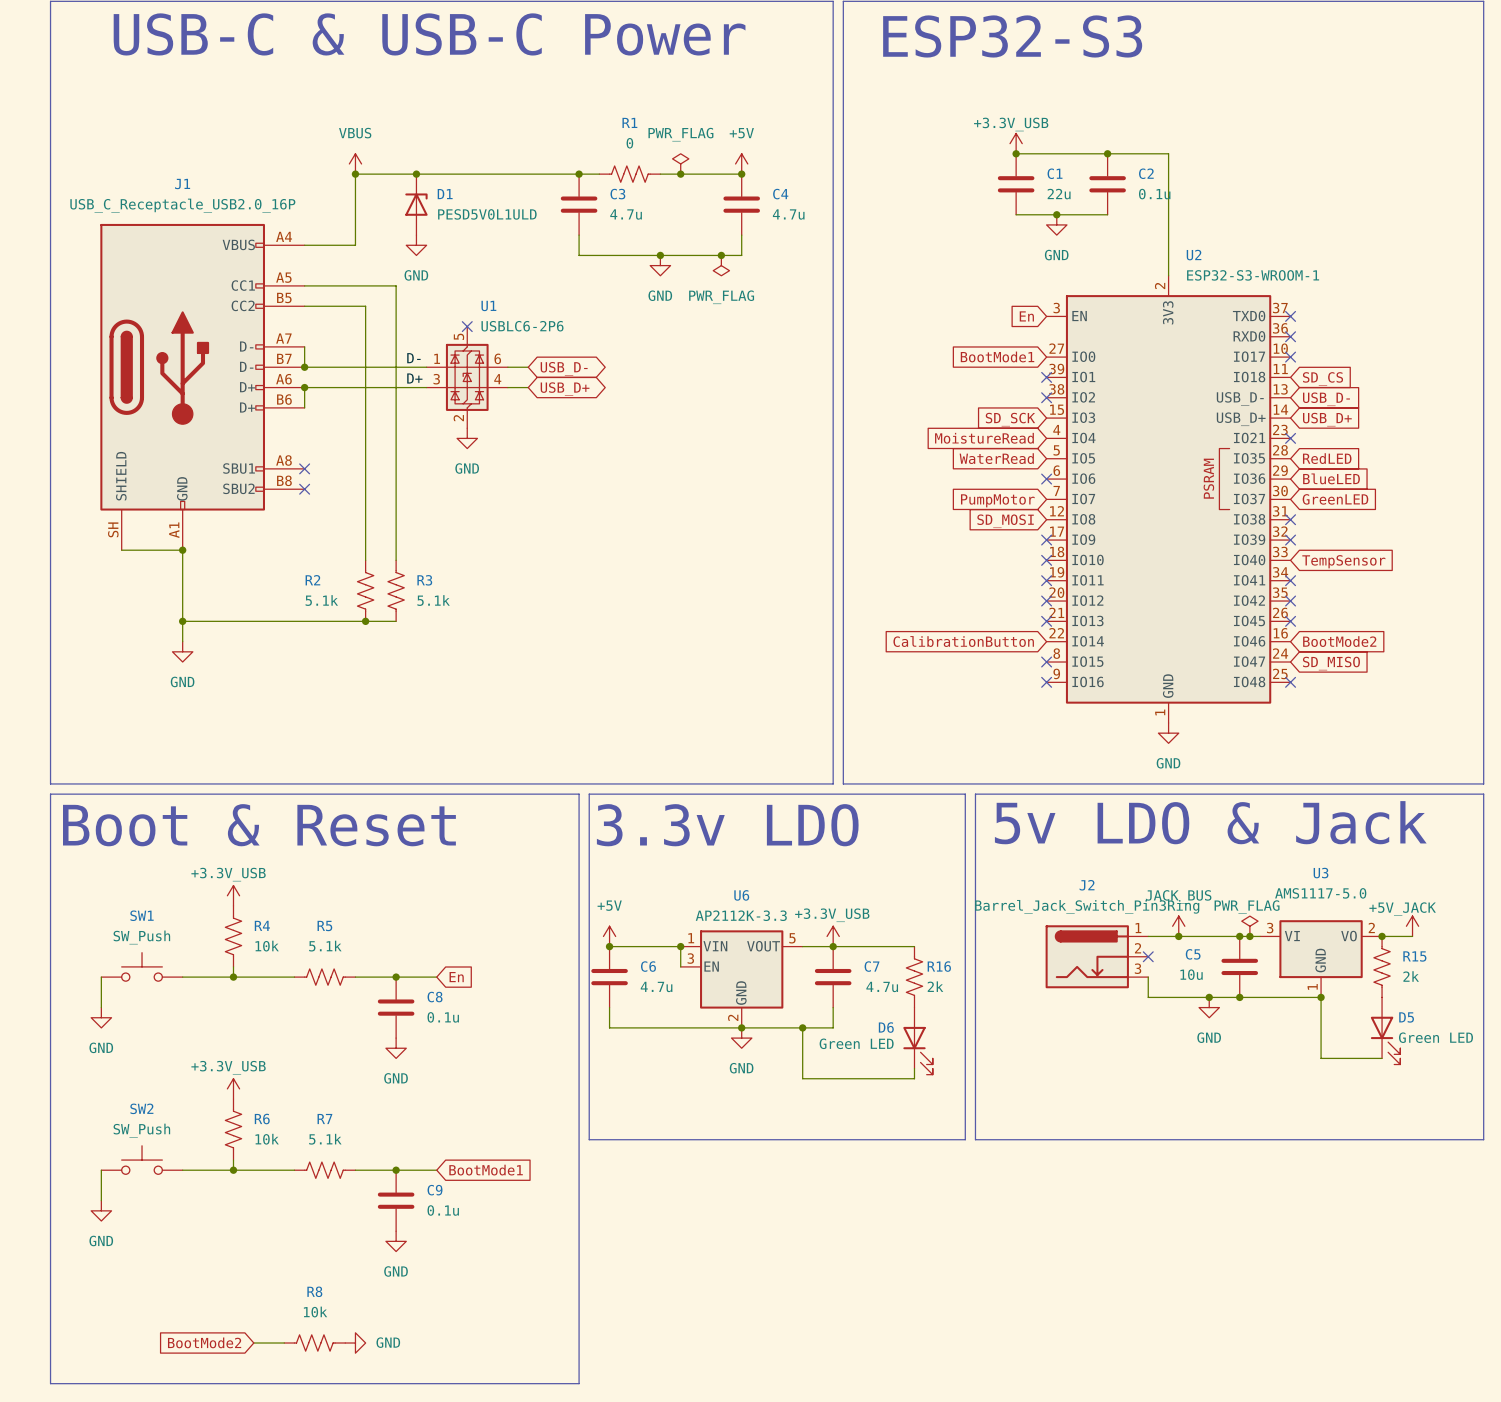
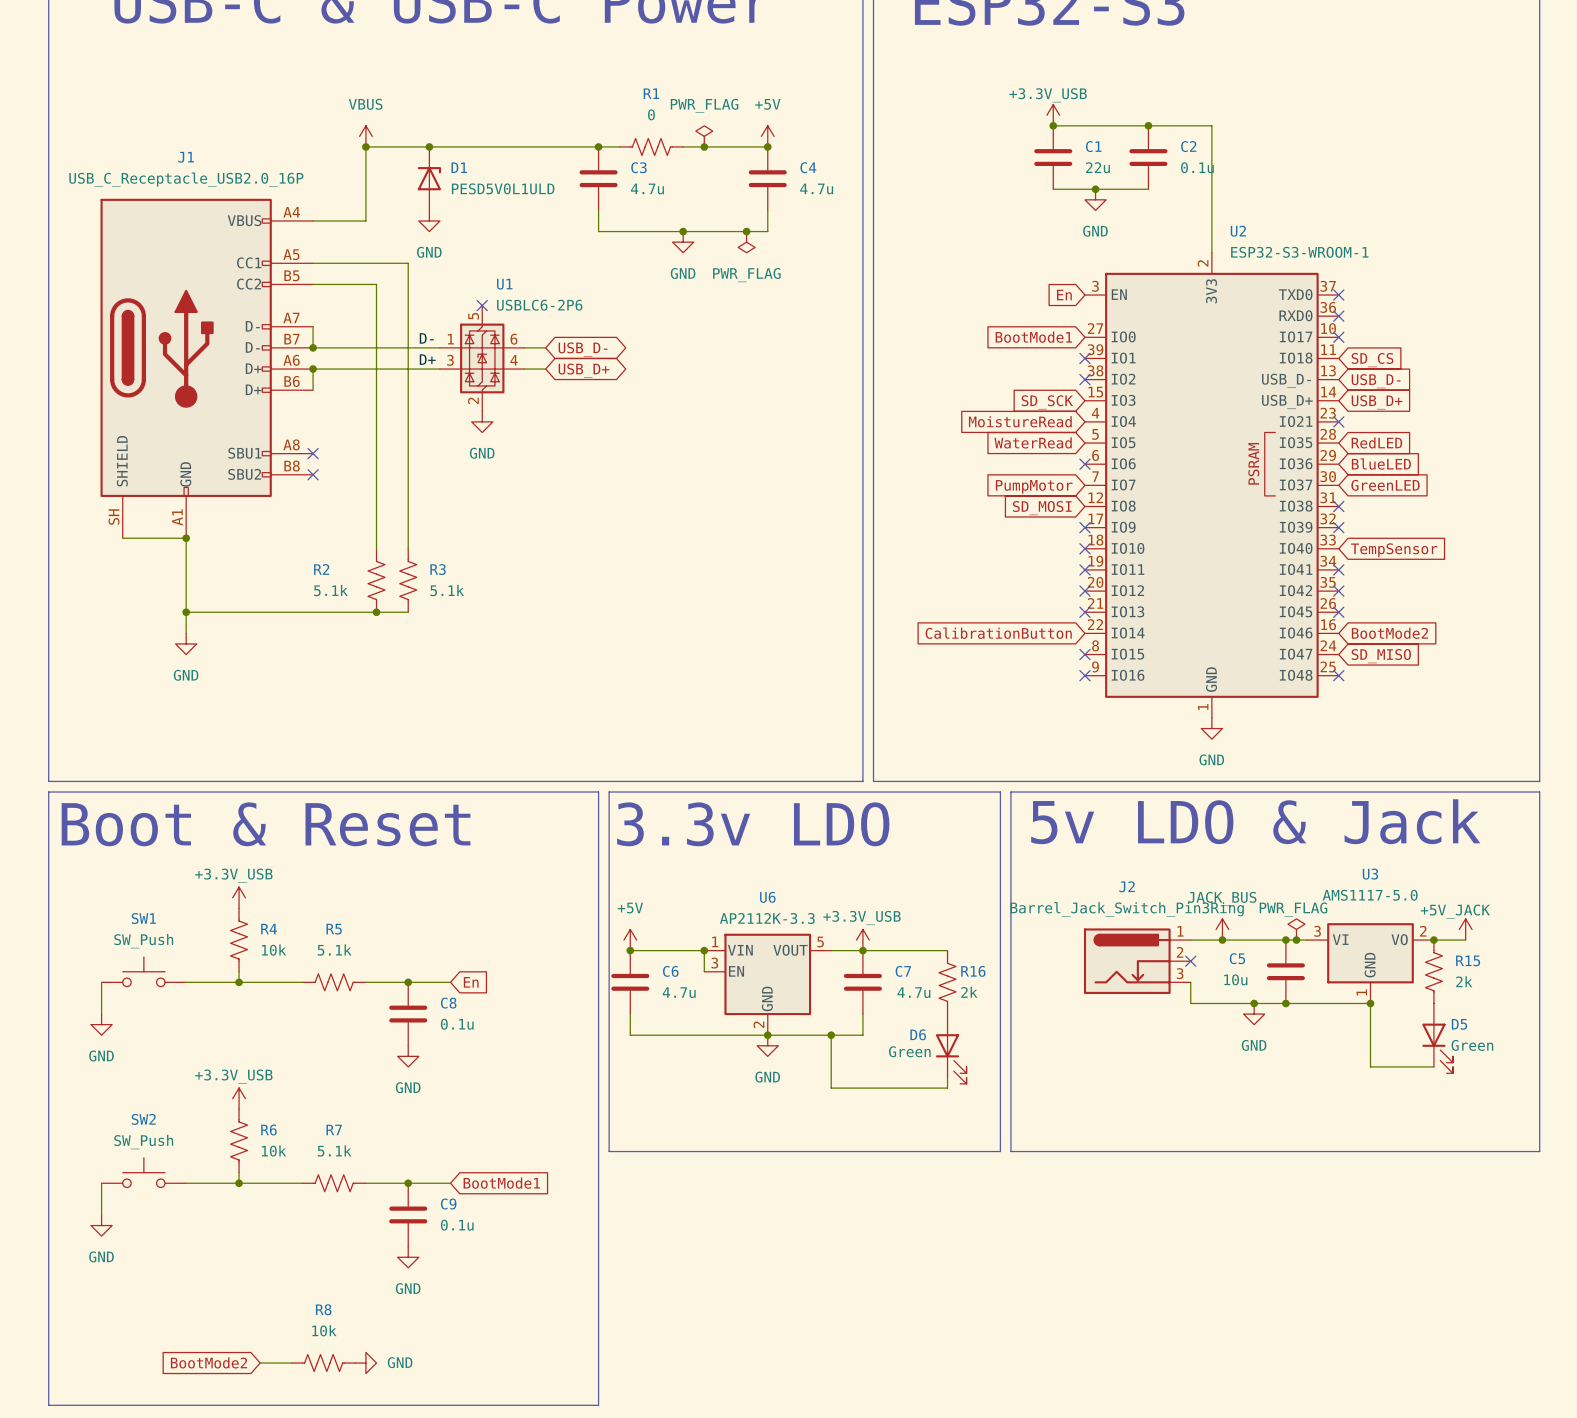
D5 value: Green LED (1435, 1037) -> Green (1472, 1045)
D6 value: Green LED (856, 1043) -> Green (909, 1051)

